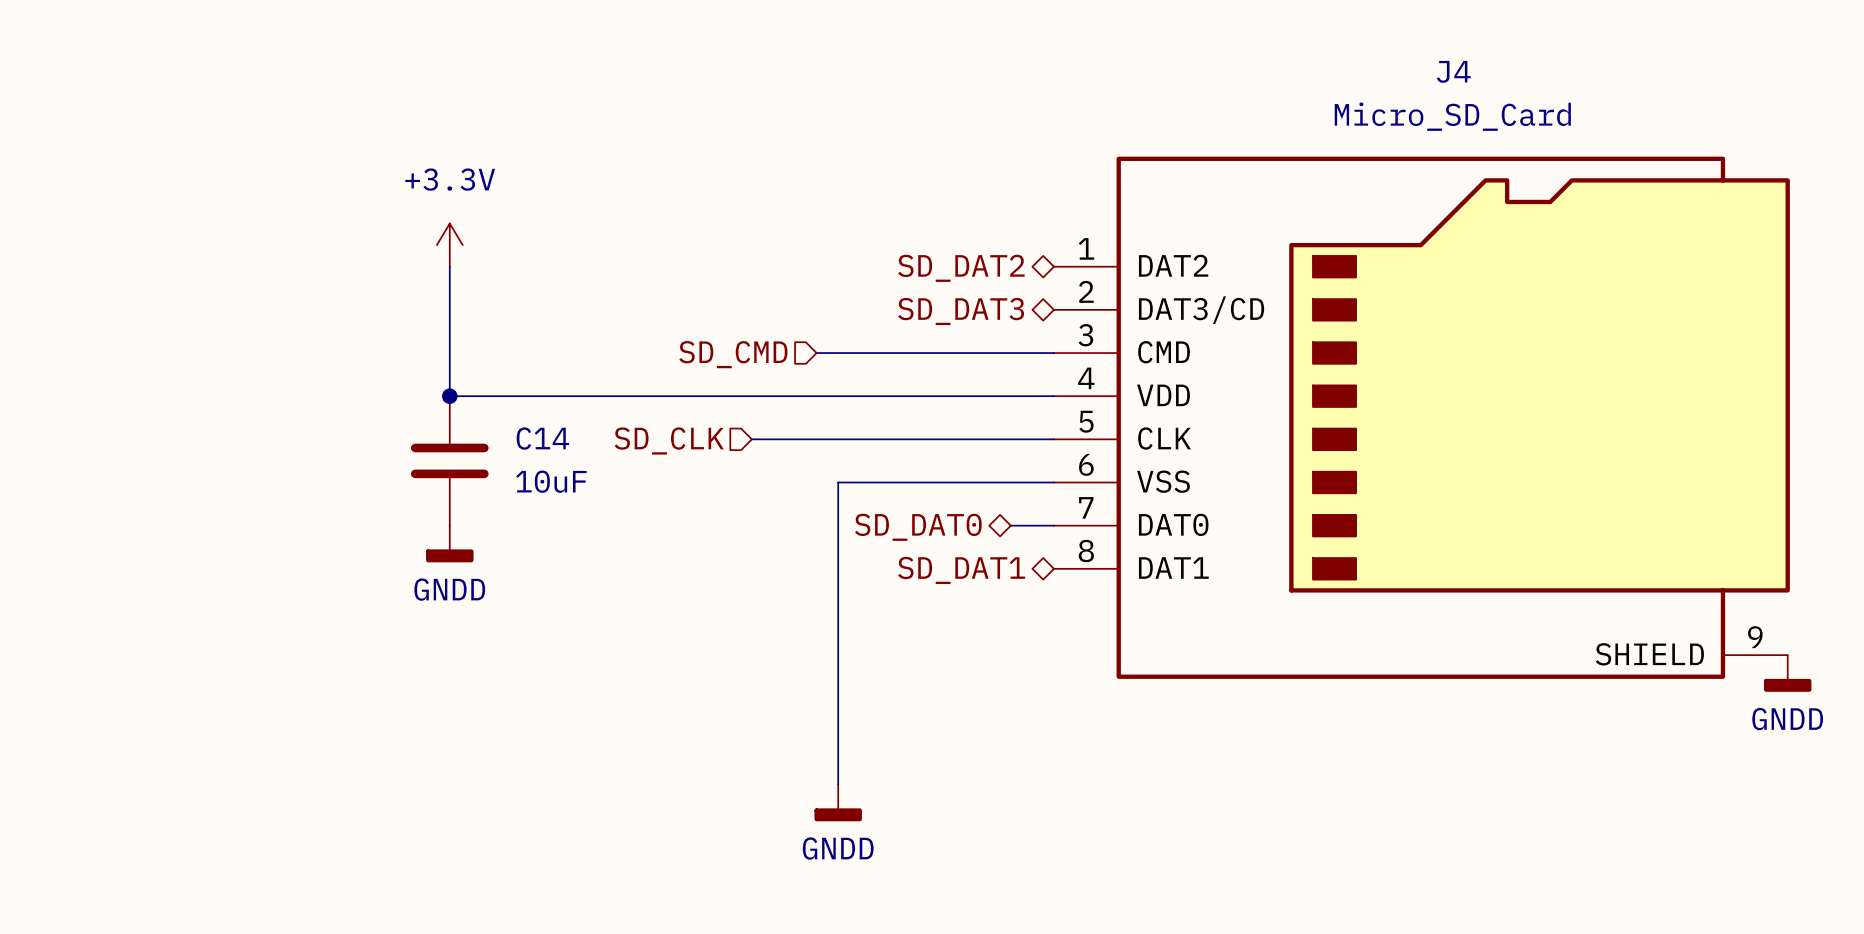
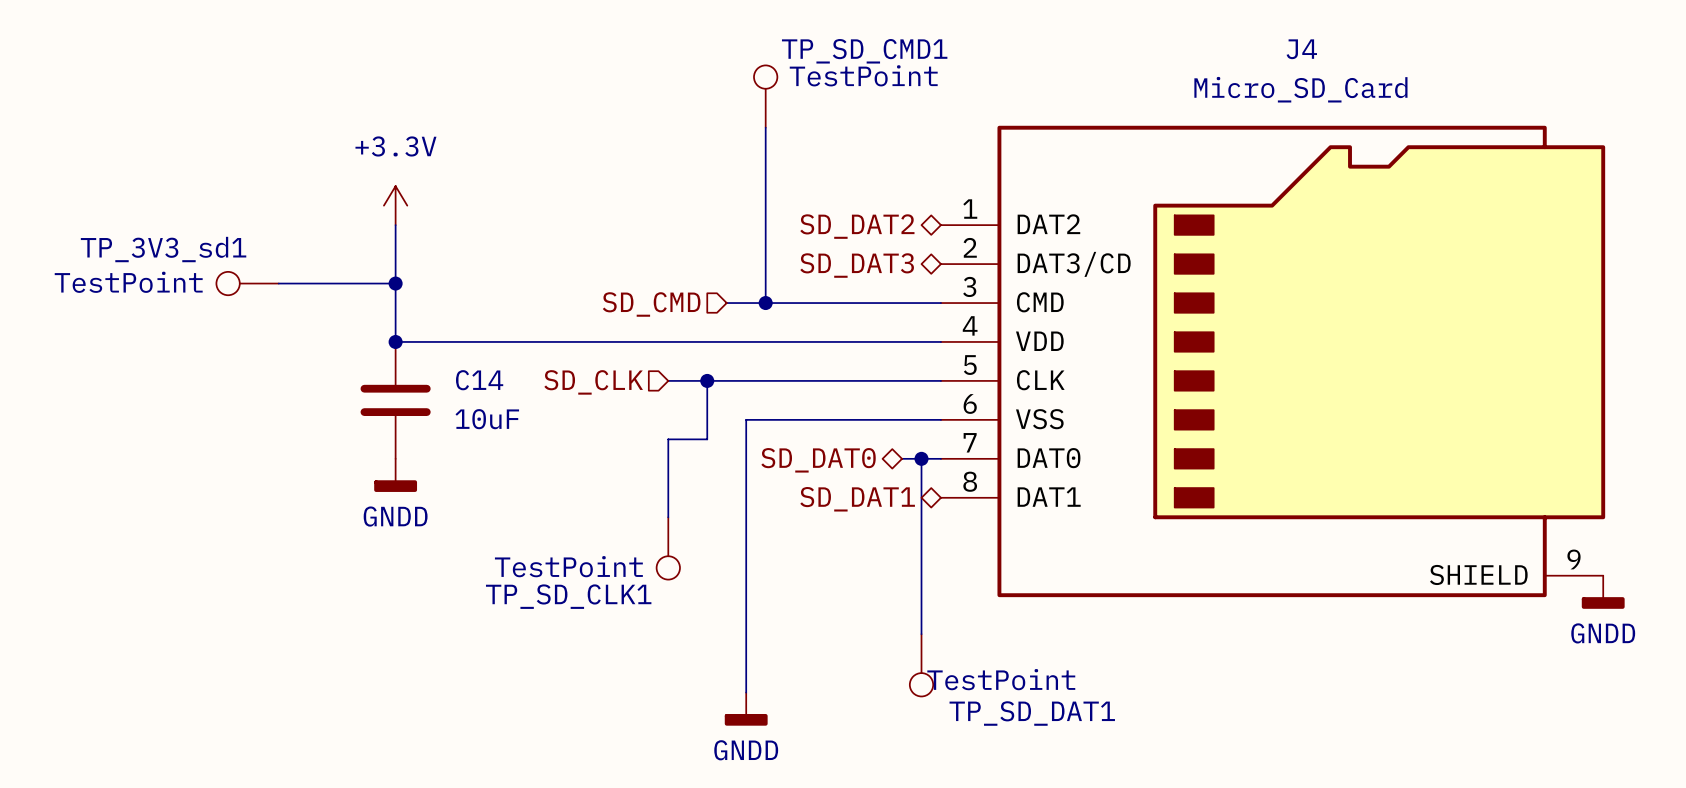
TP_SD_CMD1: none -> TestPoint (765, 96)
wire: none -> (765, 127) (765, 303)
TP_3V3_sd1: none -> TestPoint (247, 283)
wire: none -> (278, 283) (395, 283)
junction: none -> (395, 283)
junction: none -> (765, 303)
wire: none -> (707, 380) (707, 439) (668, 439) (668, 517)
junction: none -> (707, 380)
wire: none -> (921, 458) (921, 634)
junction: none -> (921, 458)
TP_SD_CLK1: none -> TestPoint (668, 548)
TP_SD_DAT1: none -> TestPoint (921, 665)

